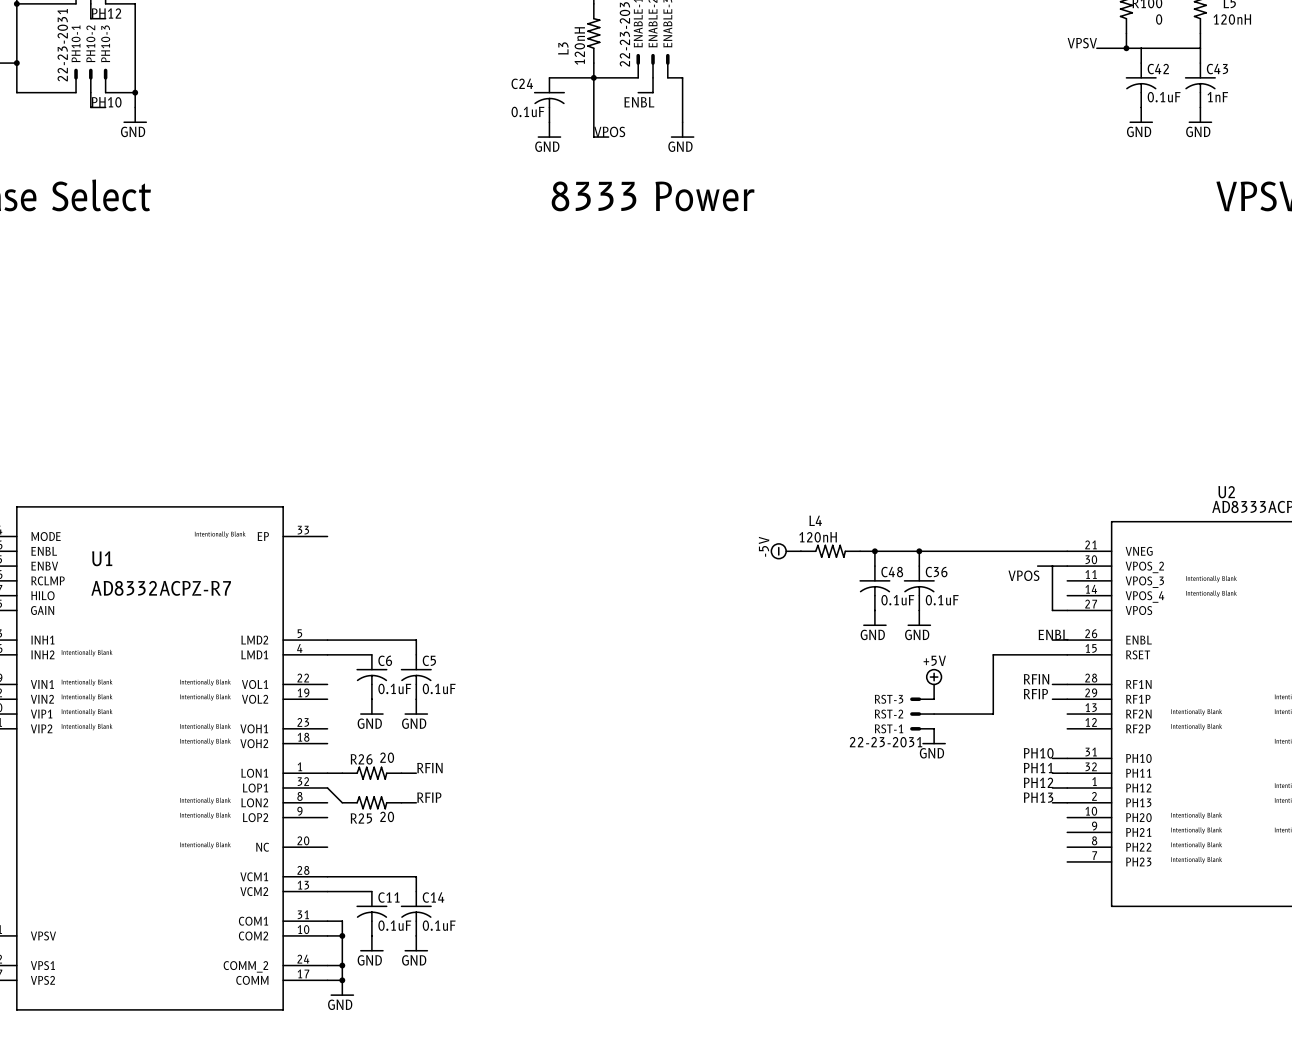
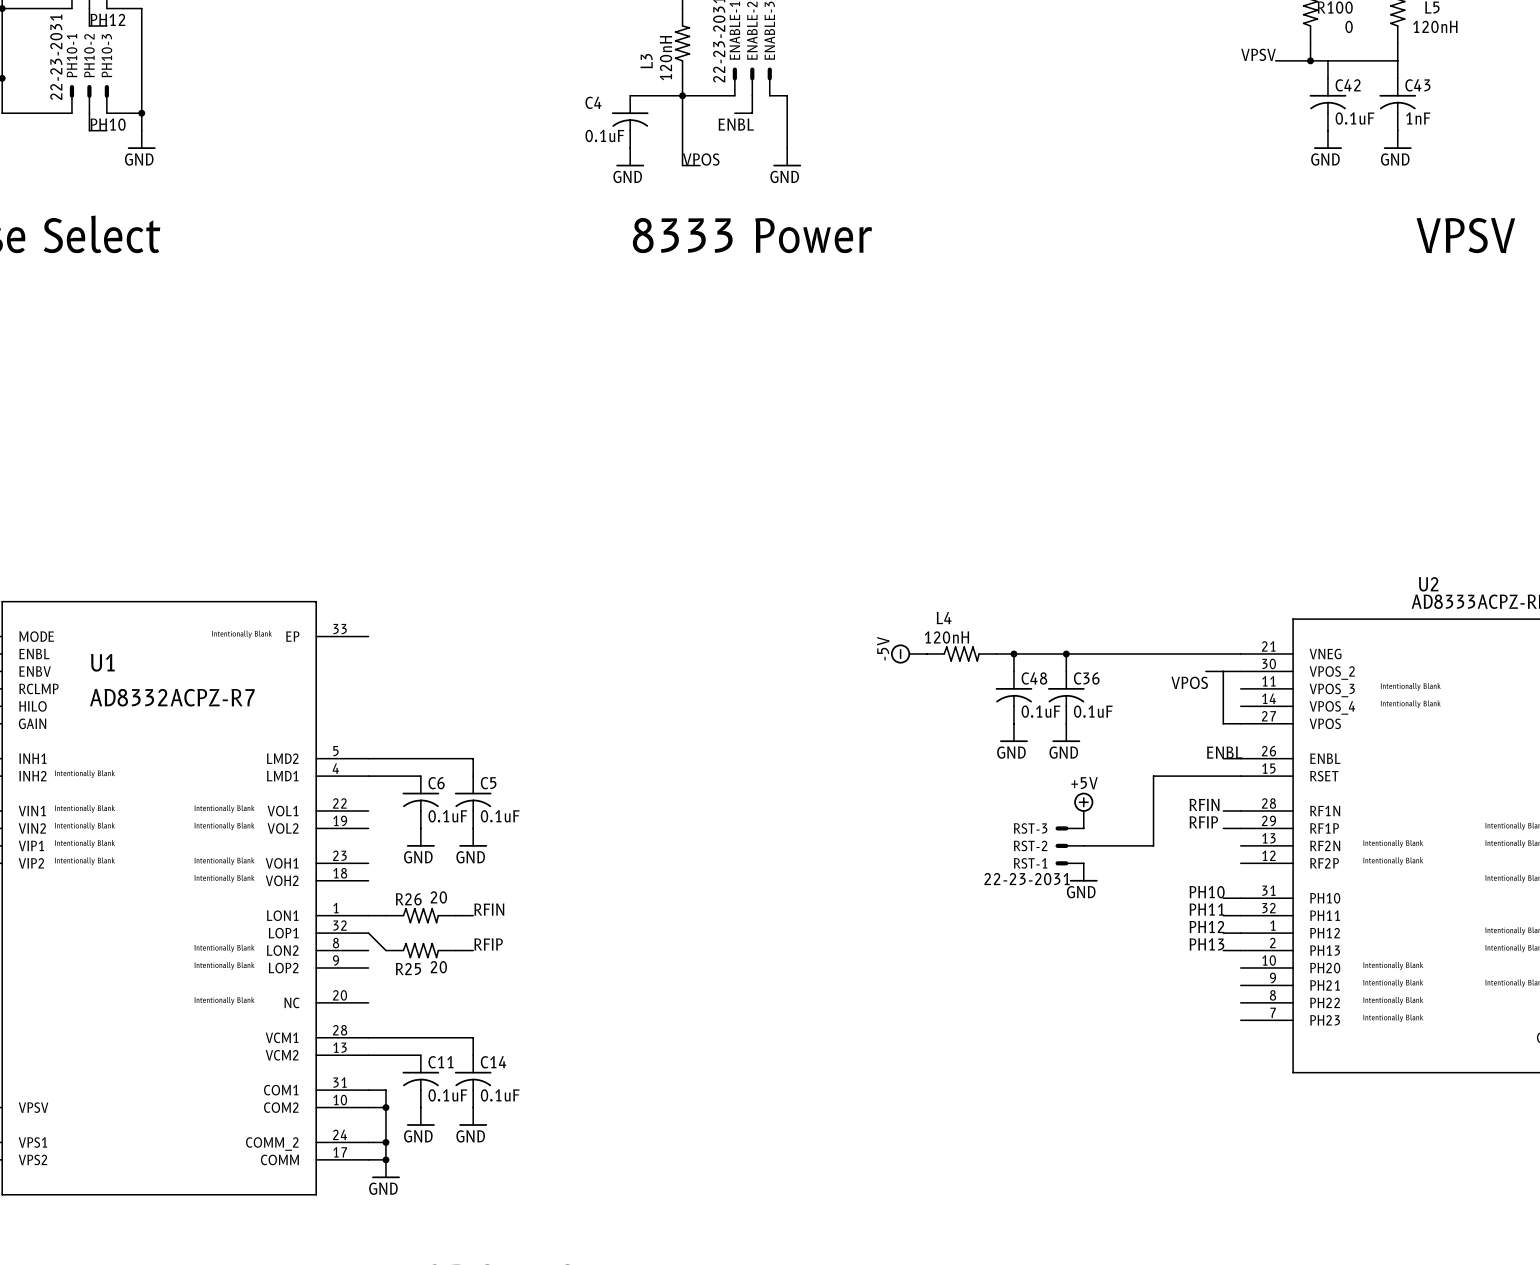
C24 name: C24 (522, 83) -> C4 (593, 102)

